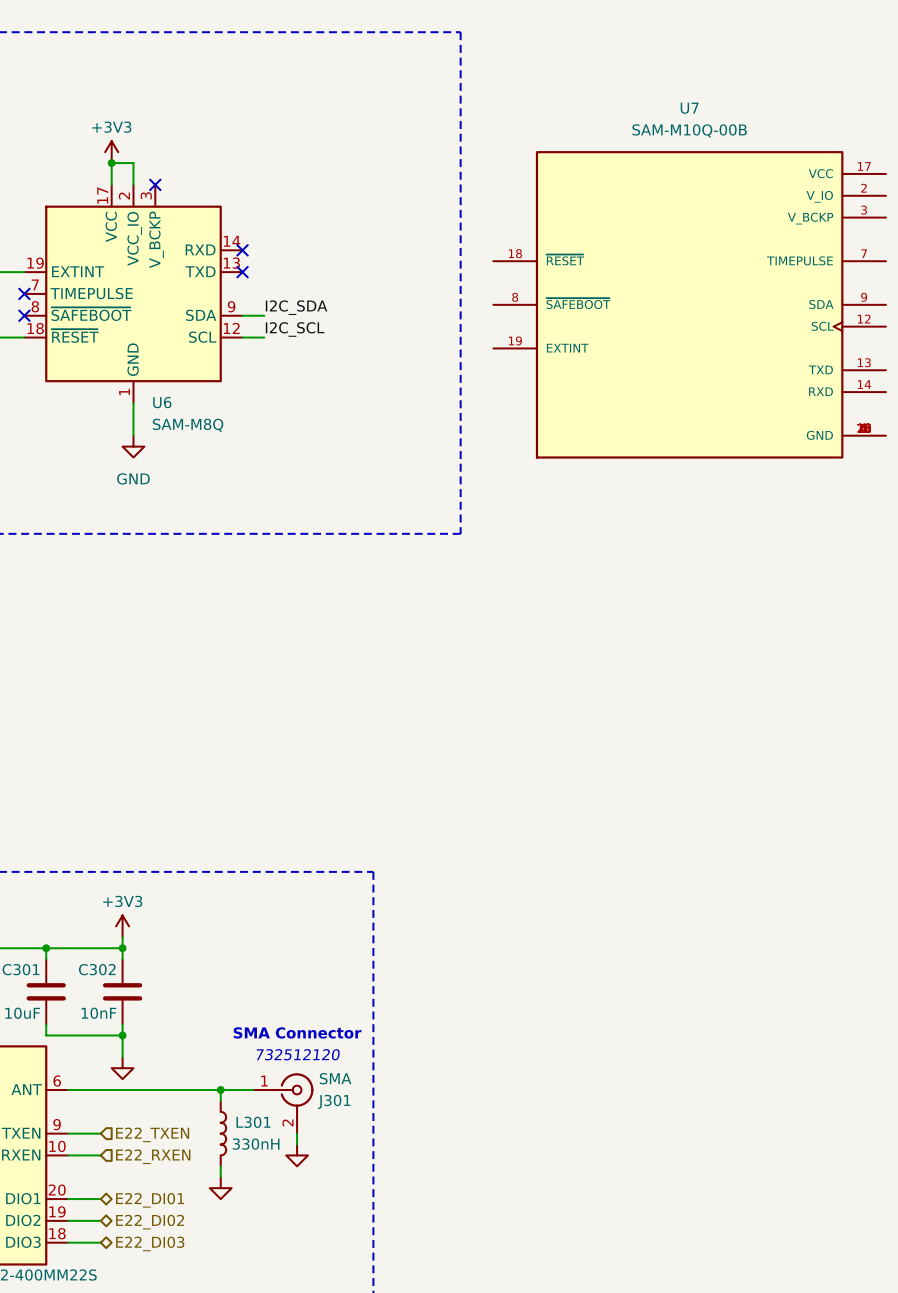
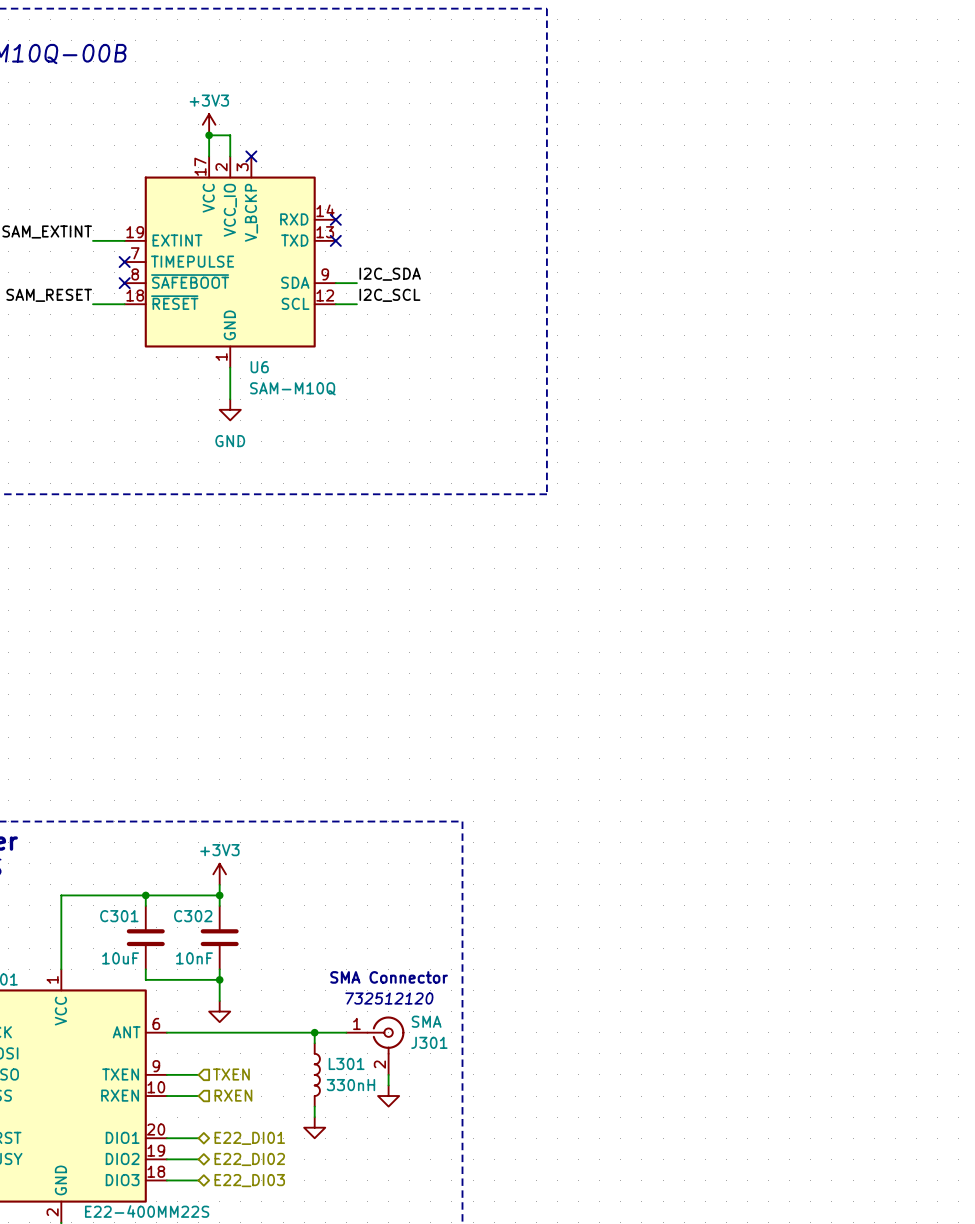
U7: SAM-M10Q-00B (689, 304) -> none
U6 value: SAM-M8Q (188, 425) -> SAM-M10Q (292, 388)
hierarchical label: E22_TXEN (152, 1134) -> TXEN (231, 1074)
hierarchical label: E22_RXEN (153, 1156) -> RXEN (233, 1095)

